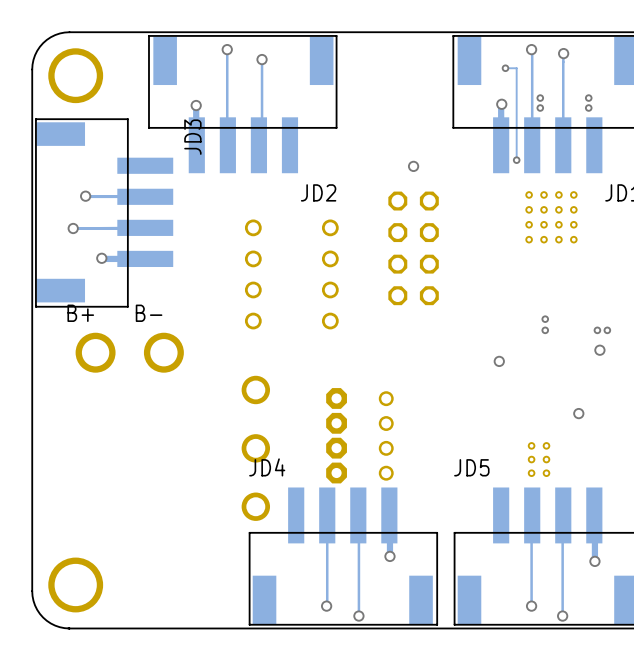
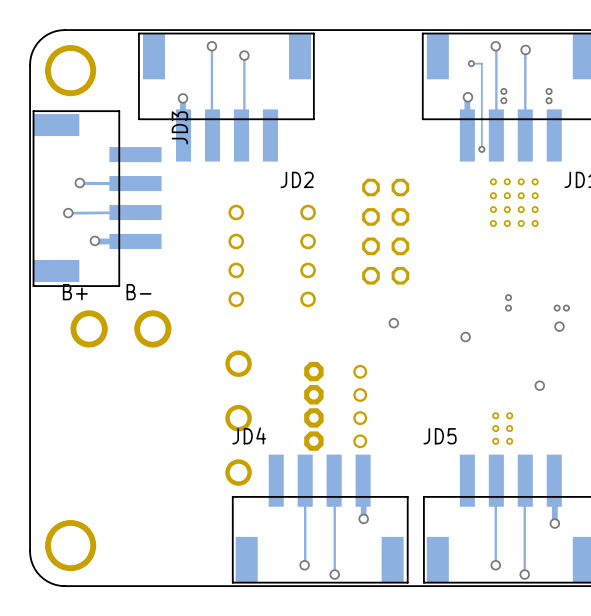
via: (413, 166) -> none
via: none -> (393, 323)

